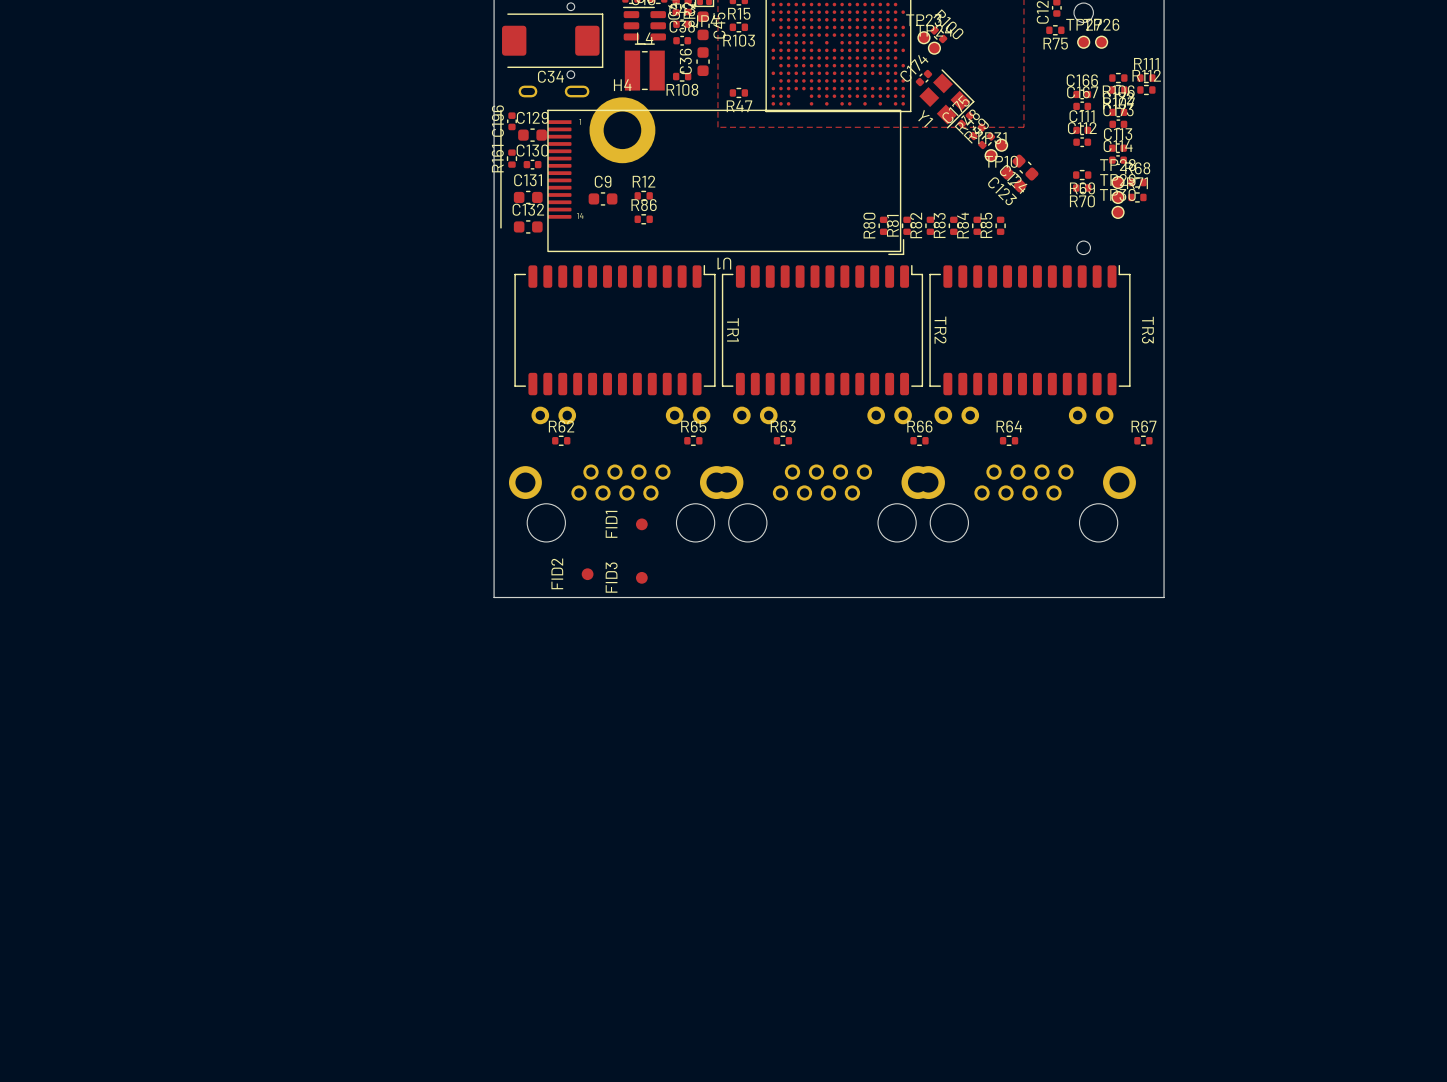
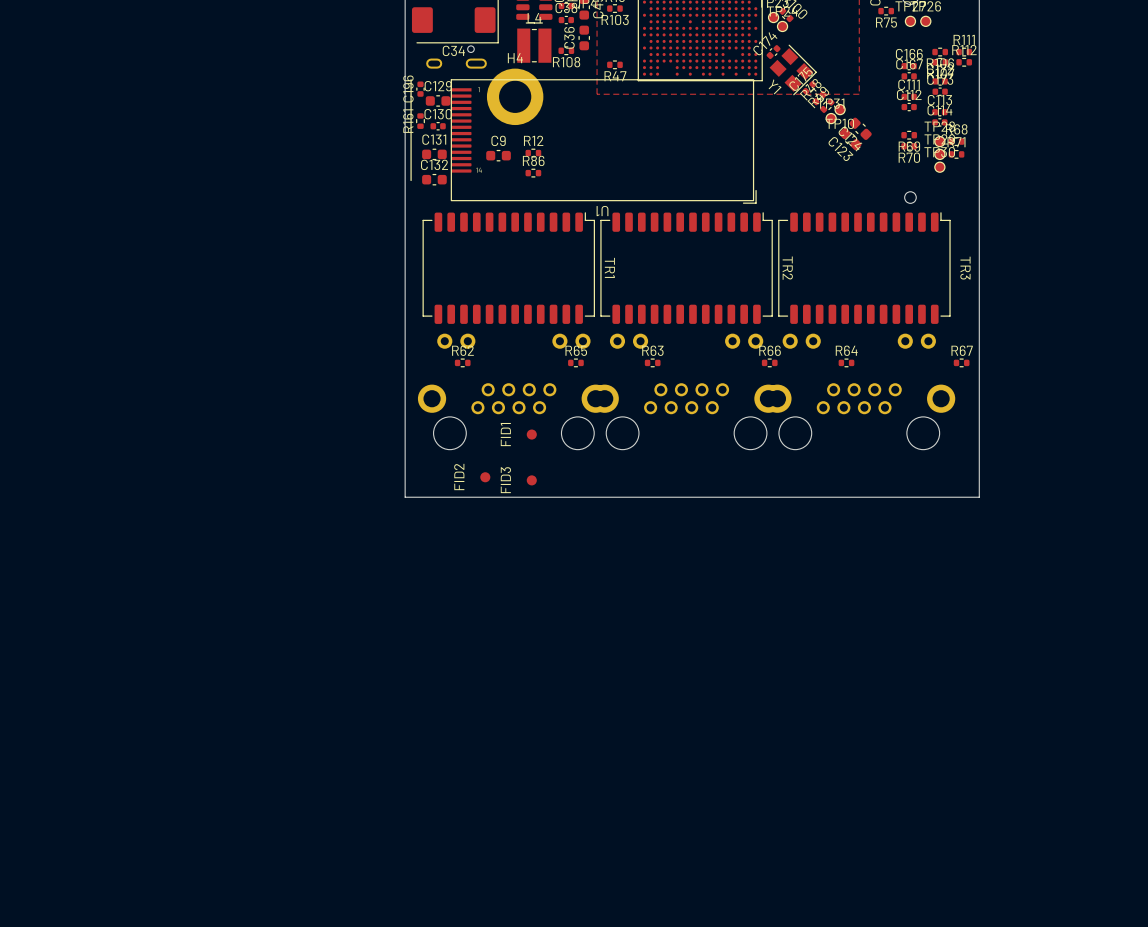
R80: (883, 225) -> none
R81: (907, 225) -> none
R82: (930, 225) -> none
R83: (953, 225) -> none
R84: (977, 225) -> none
R85: (1000, 225) -> none

